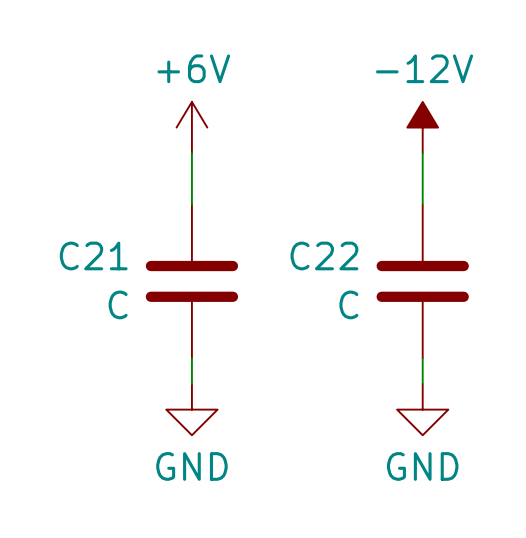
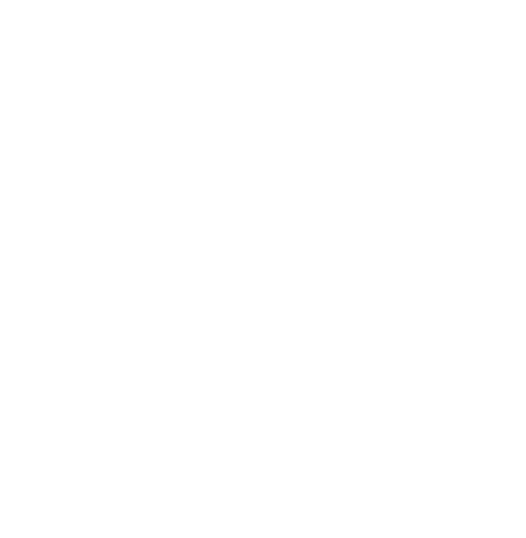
power symbol: +6V (191, 127) -> none
power symbol: -12V (422, 127) -> none
wire: (191, 153) (191, 204) -> none
wire: (422, 153) (422, 204) -> none
C21: C (191, 281) -> none
C22: C (422, 281) -> none
wire: (191, 358) (191, 383) -> none
wire: (422, 358) (422, 383) -> none
power symbol: GND (191, 409) -> none
power symbol: GND (422, 409) -> none

